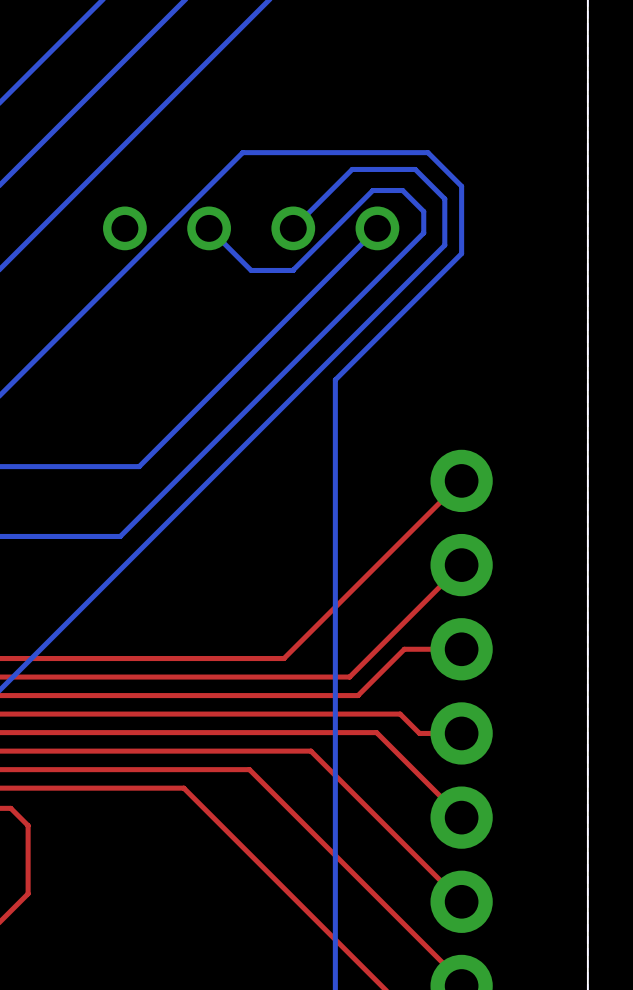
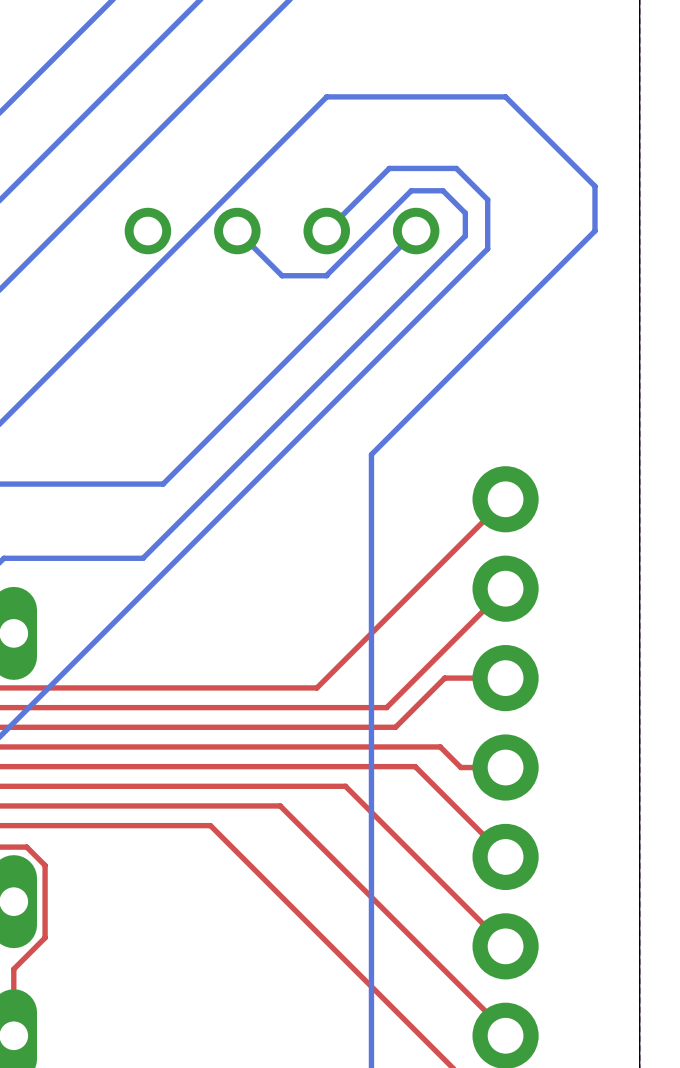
bottom track: (242, 152) (427, 152) (461, 186) (461, 253) (335, 379) (335, 438) -> (273, 150) (326, 96) (505, 96) (594, 186) (594, 231) (371, 454)

